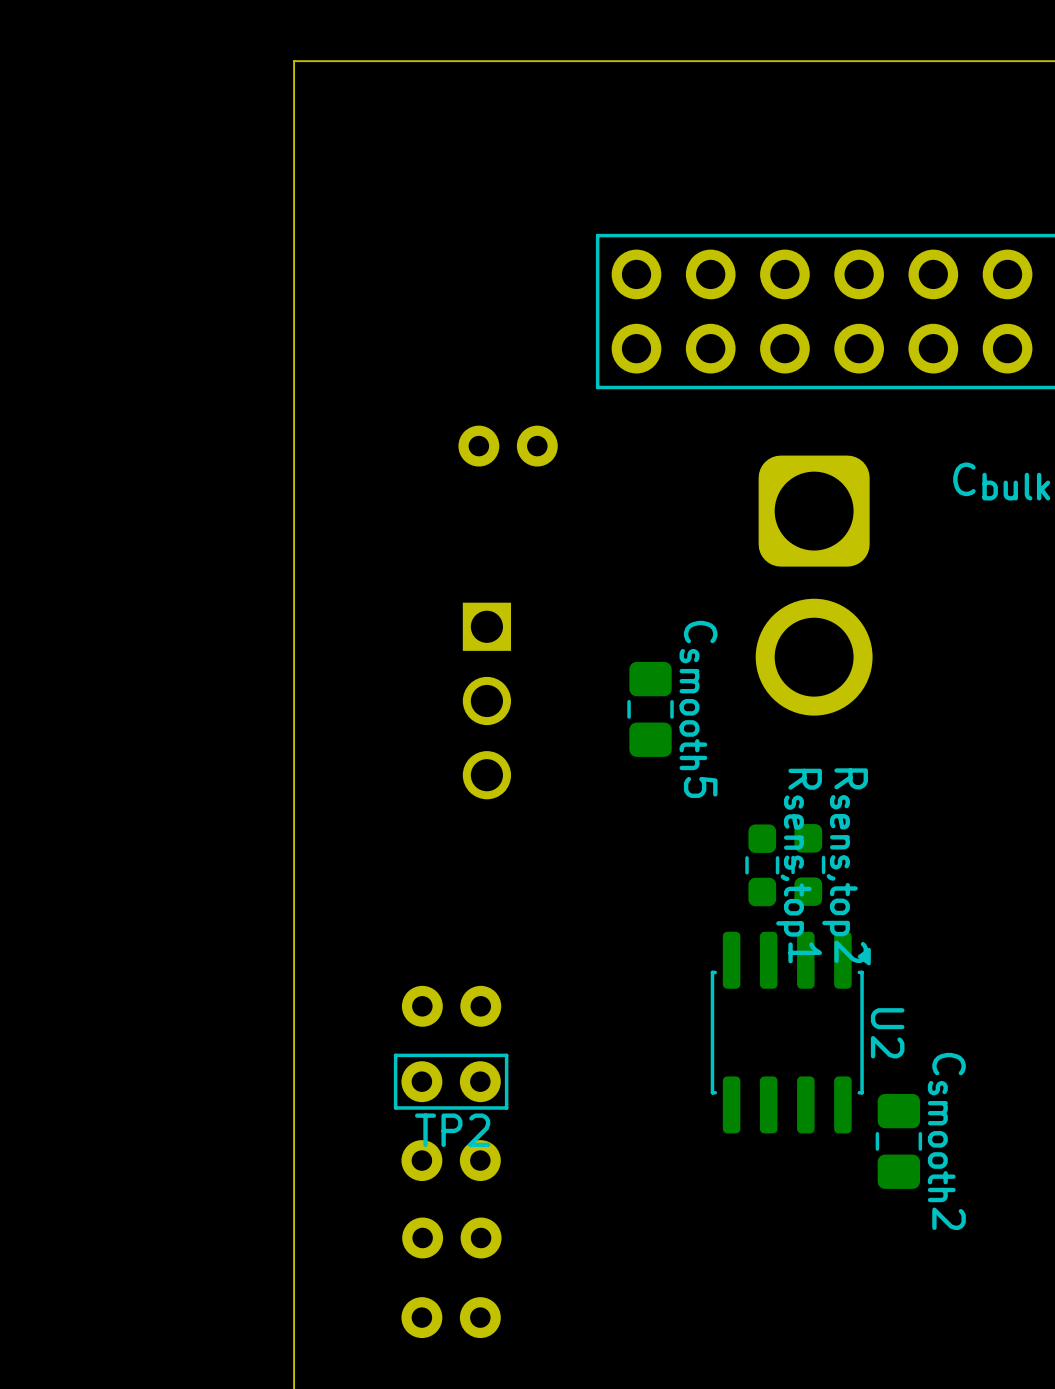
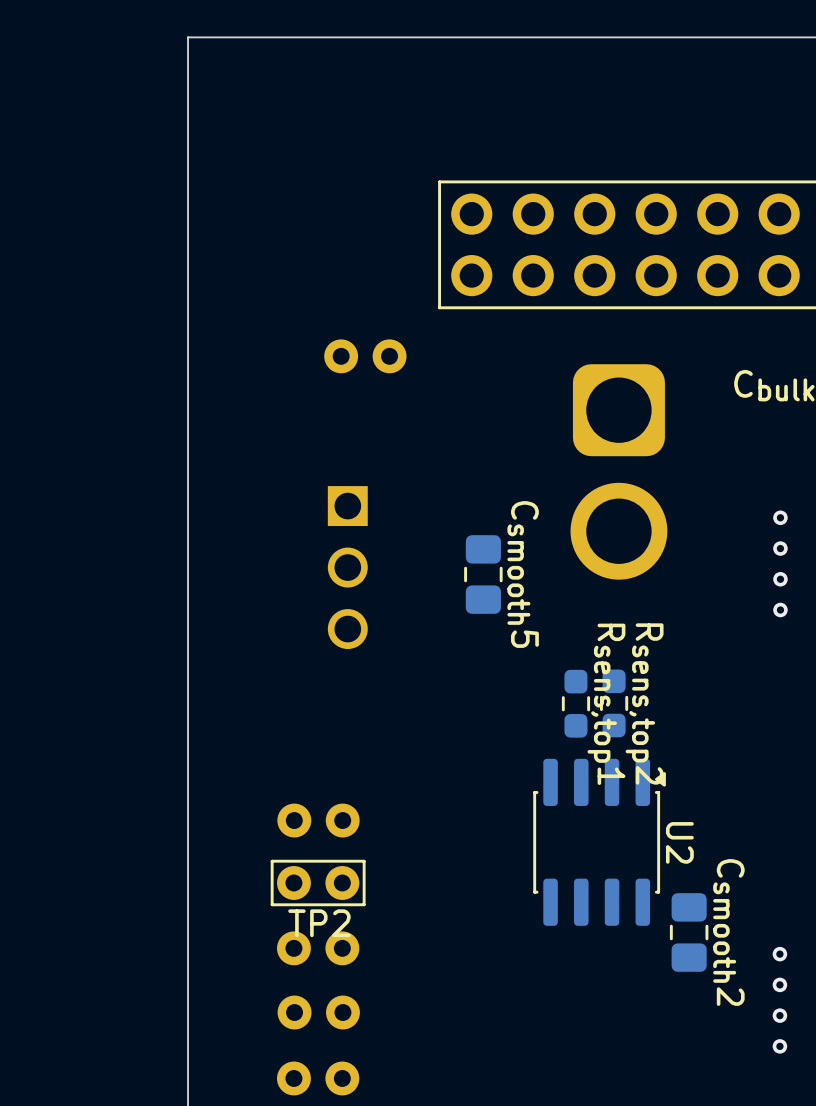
via: none -> (780, 517)
via: none -> (780, 548)
via: none -> (780, 579)
via: none -> (780, 610)
via: none -> (779, 954)
via: none -> (779, 984)
via: none -> (779, 1015)
via: none -> (779, 1046)

